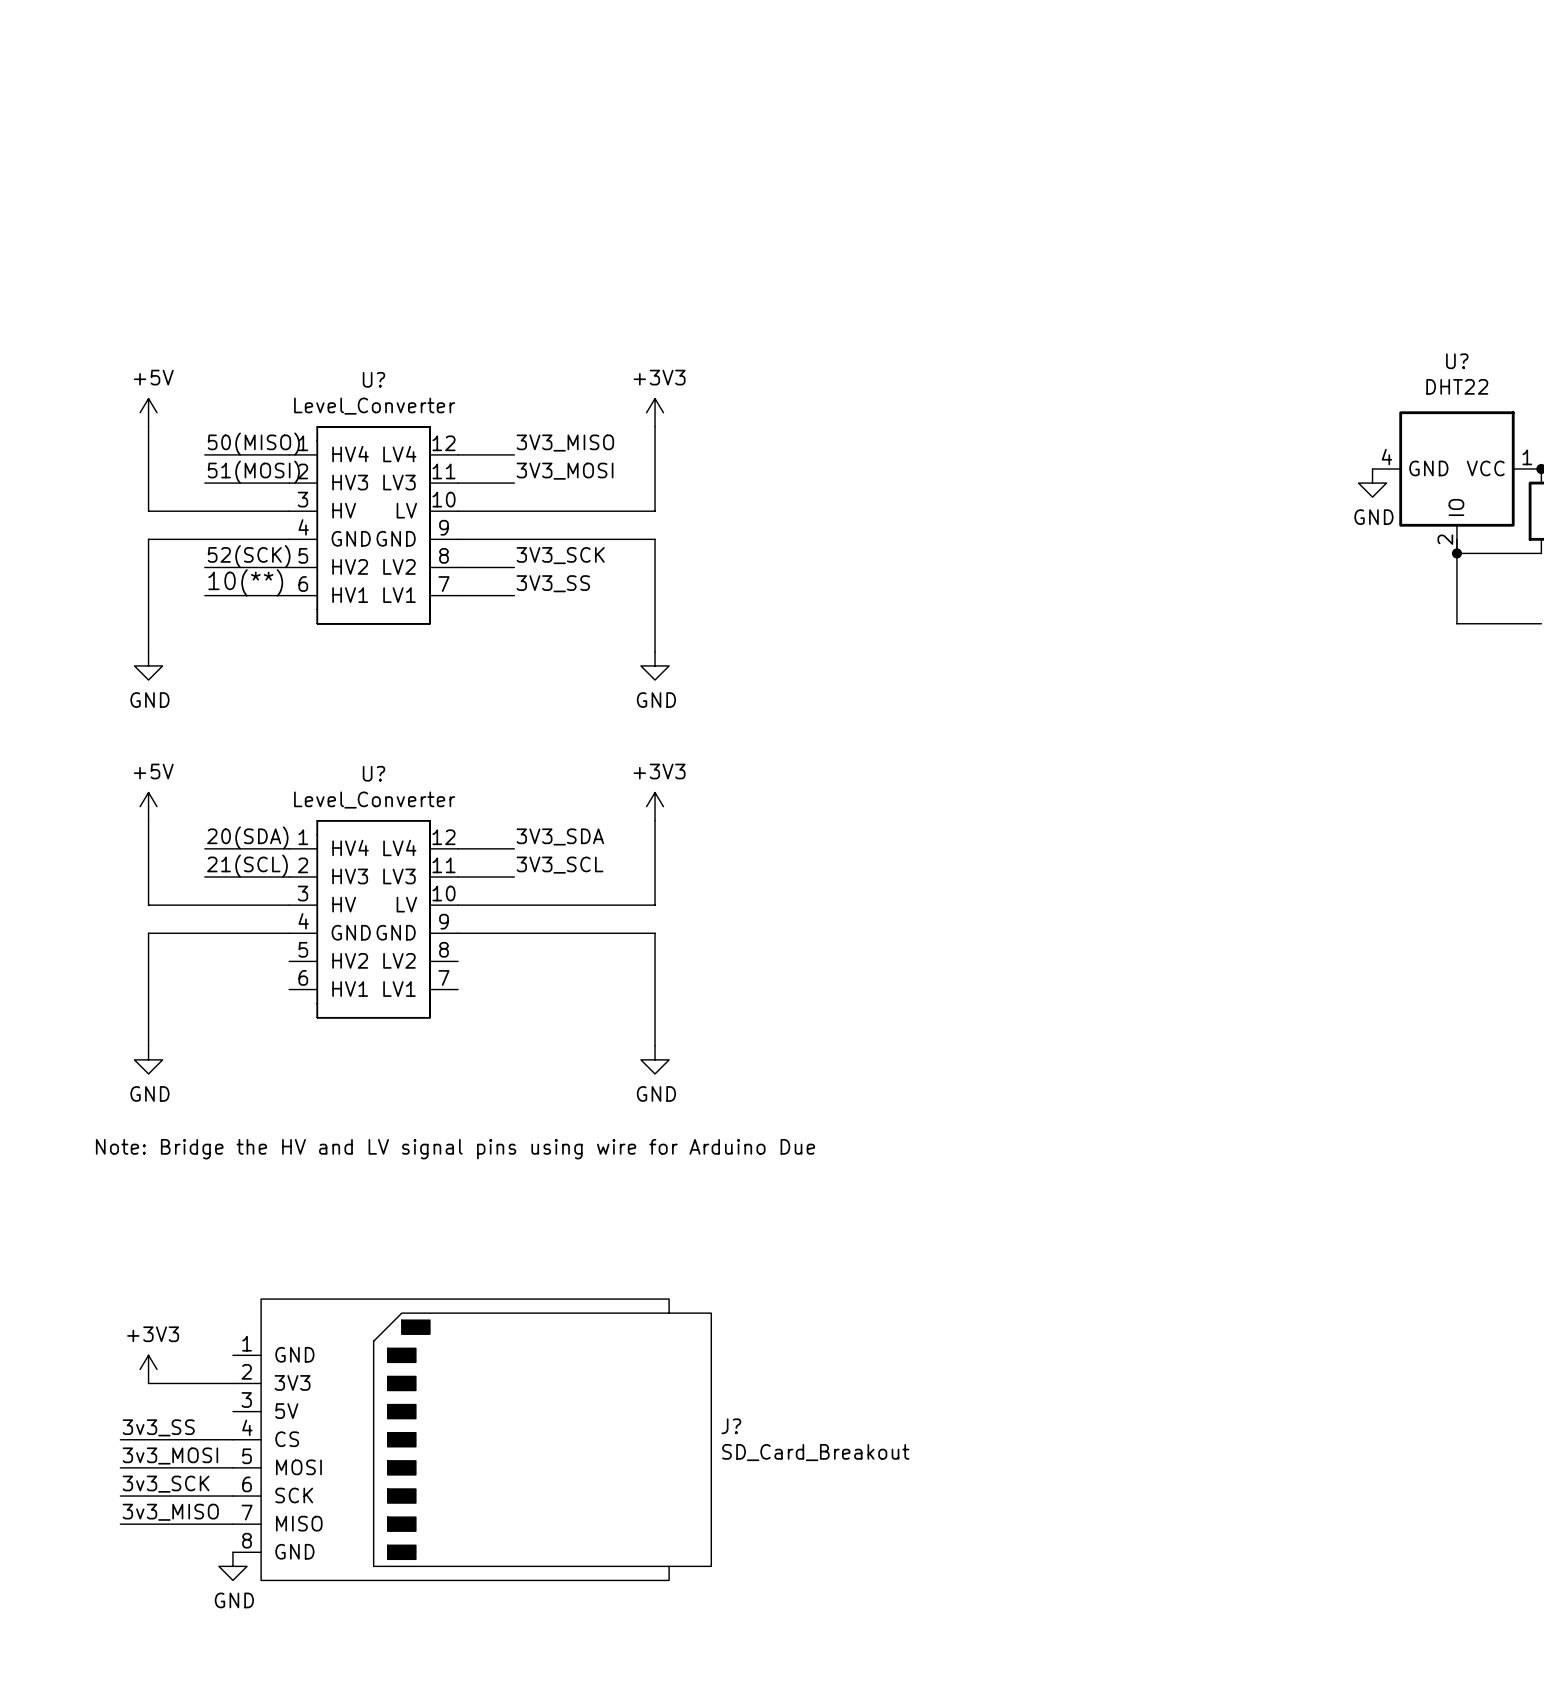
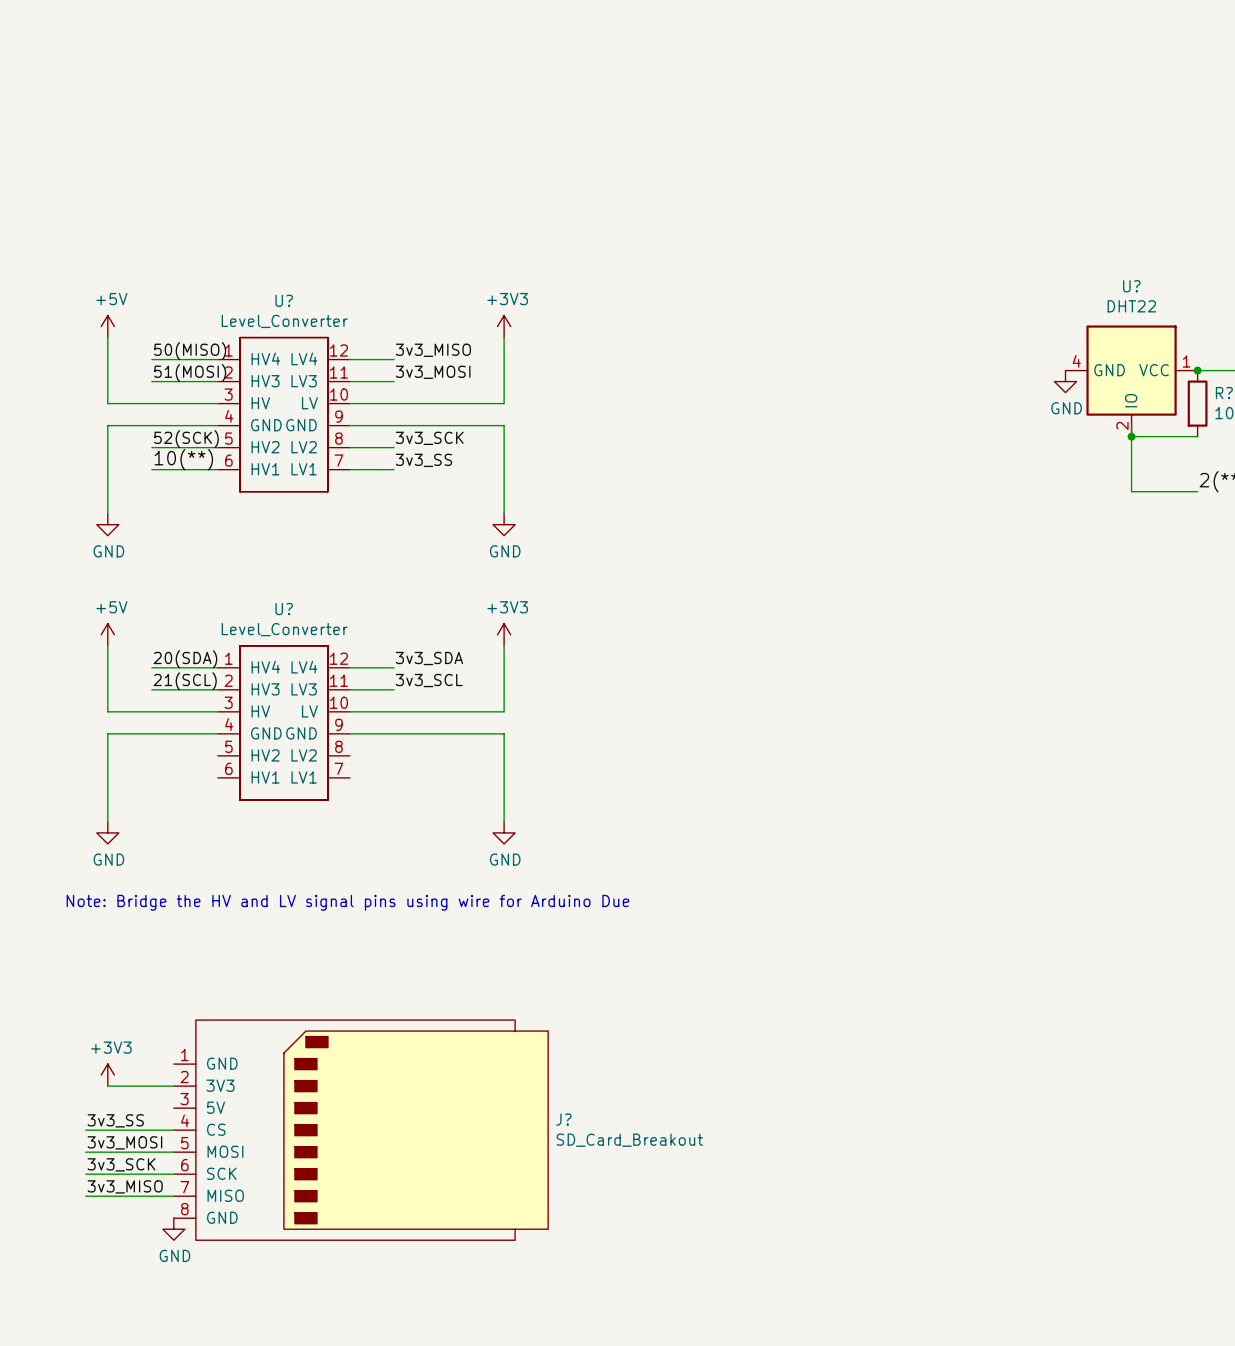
label: 3V3_MISO (565, 443) -> 3v3_MISO (433, 350)
label: 3V3_MOSI (565, 471) -> 3v3_MOSI (433, 372)
label: 3V3_SCK (560, 555) -> 3v3_SCK (429, 438)
label: 3V3_SS (553, 583) -> 3v3_SS (423, 460)
label: 3V3_SDA (560, 836) -> 3v3_SDA (429, 658)
label: 3V3_SCL (560, 865) -> 3v3_SCL (429, 680)

